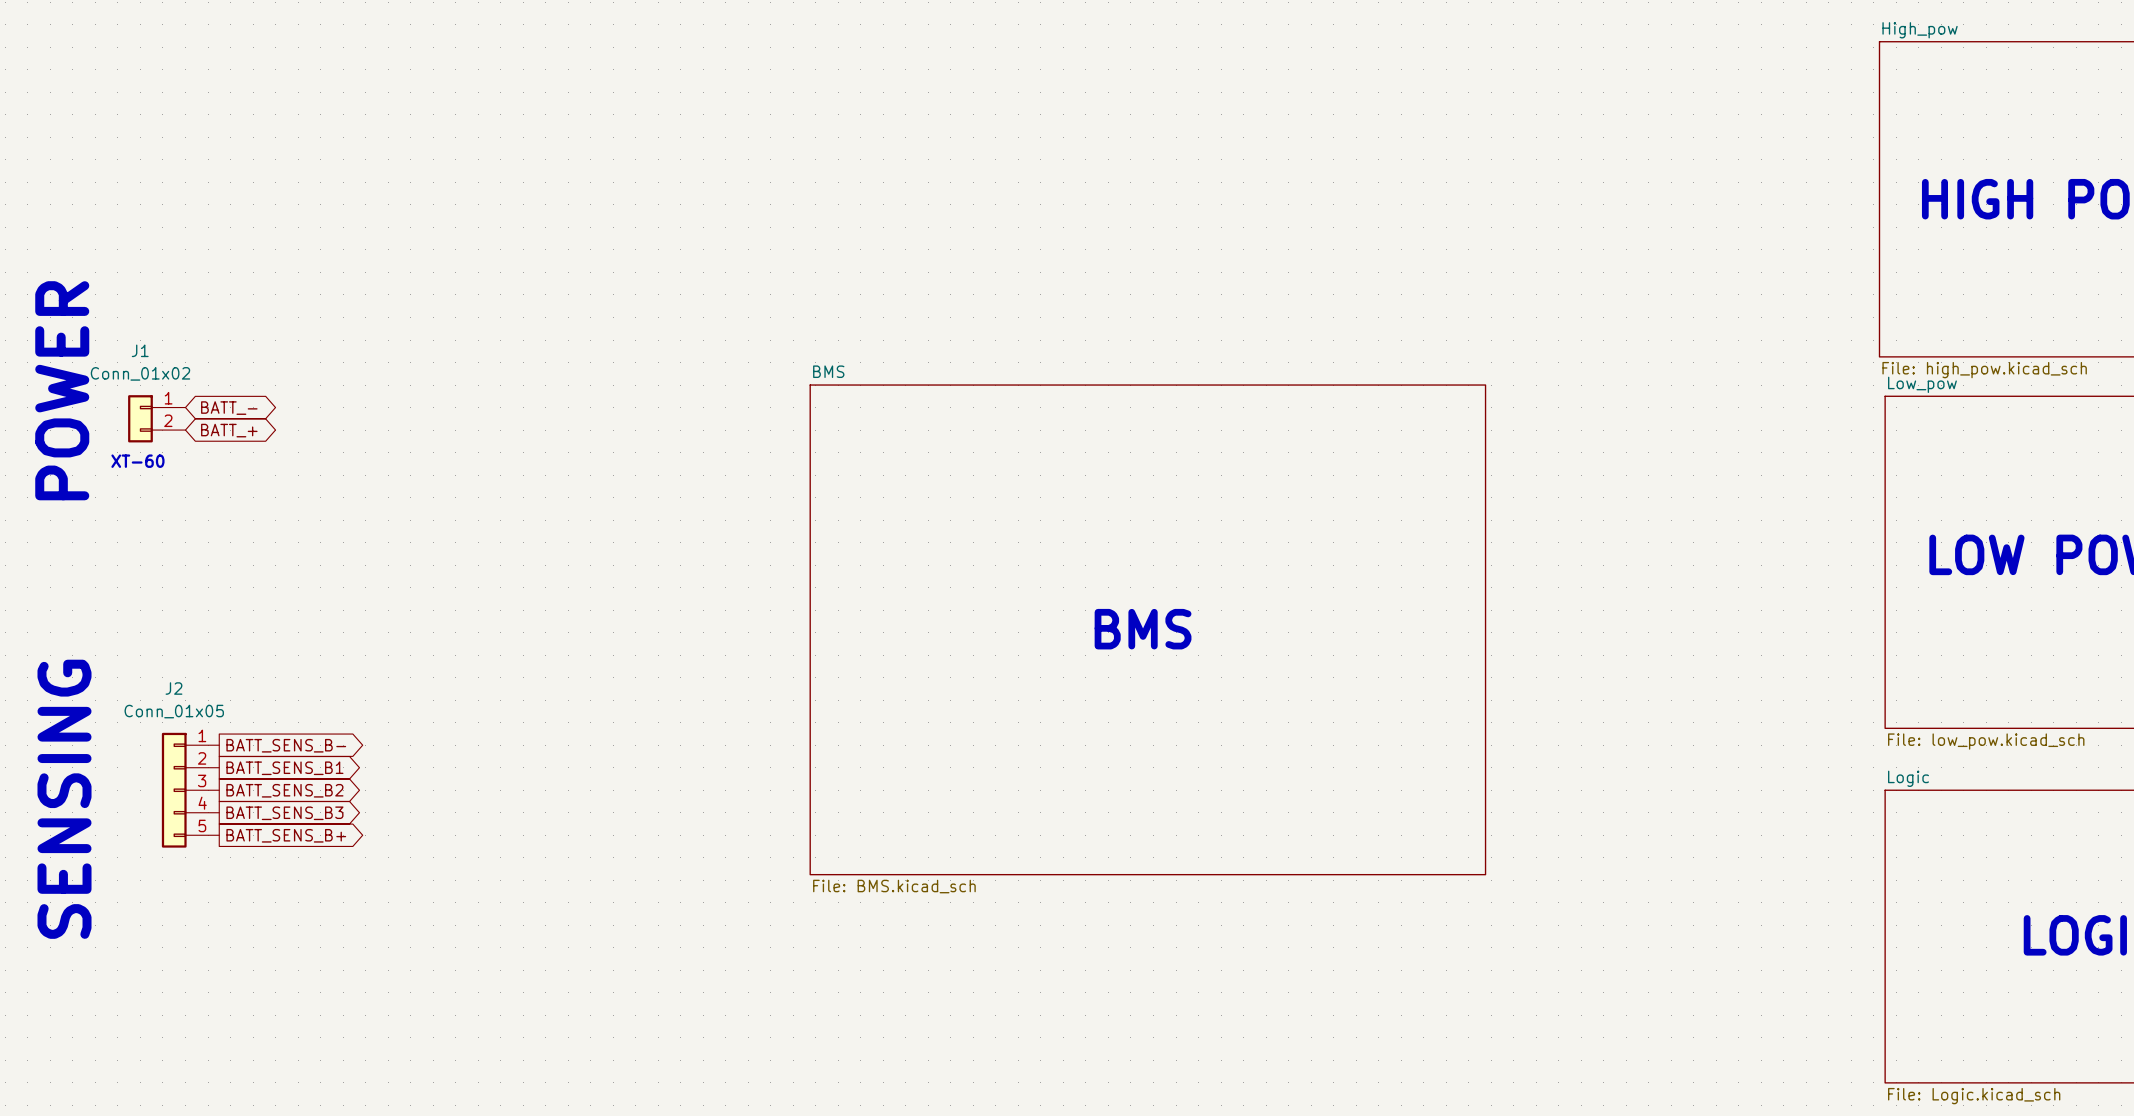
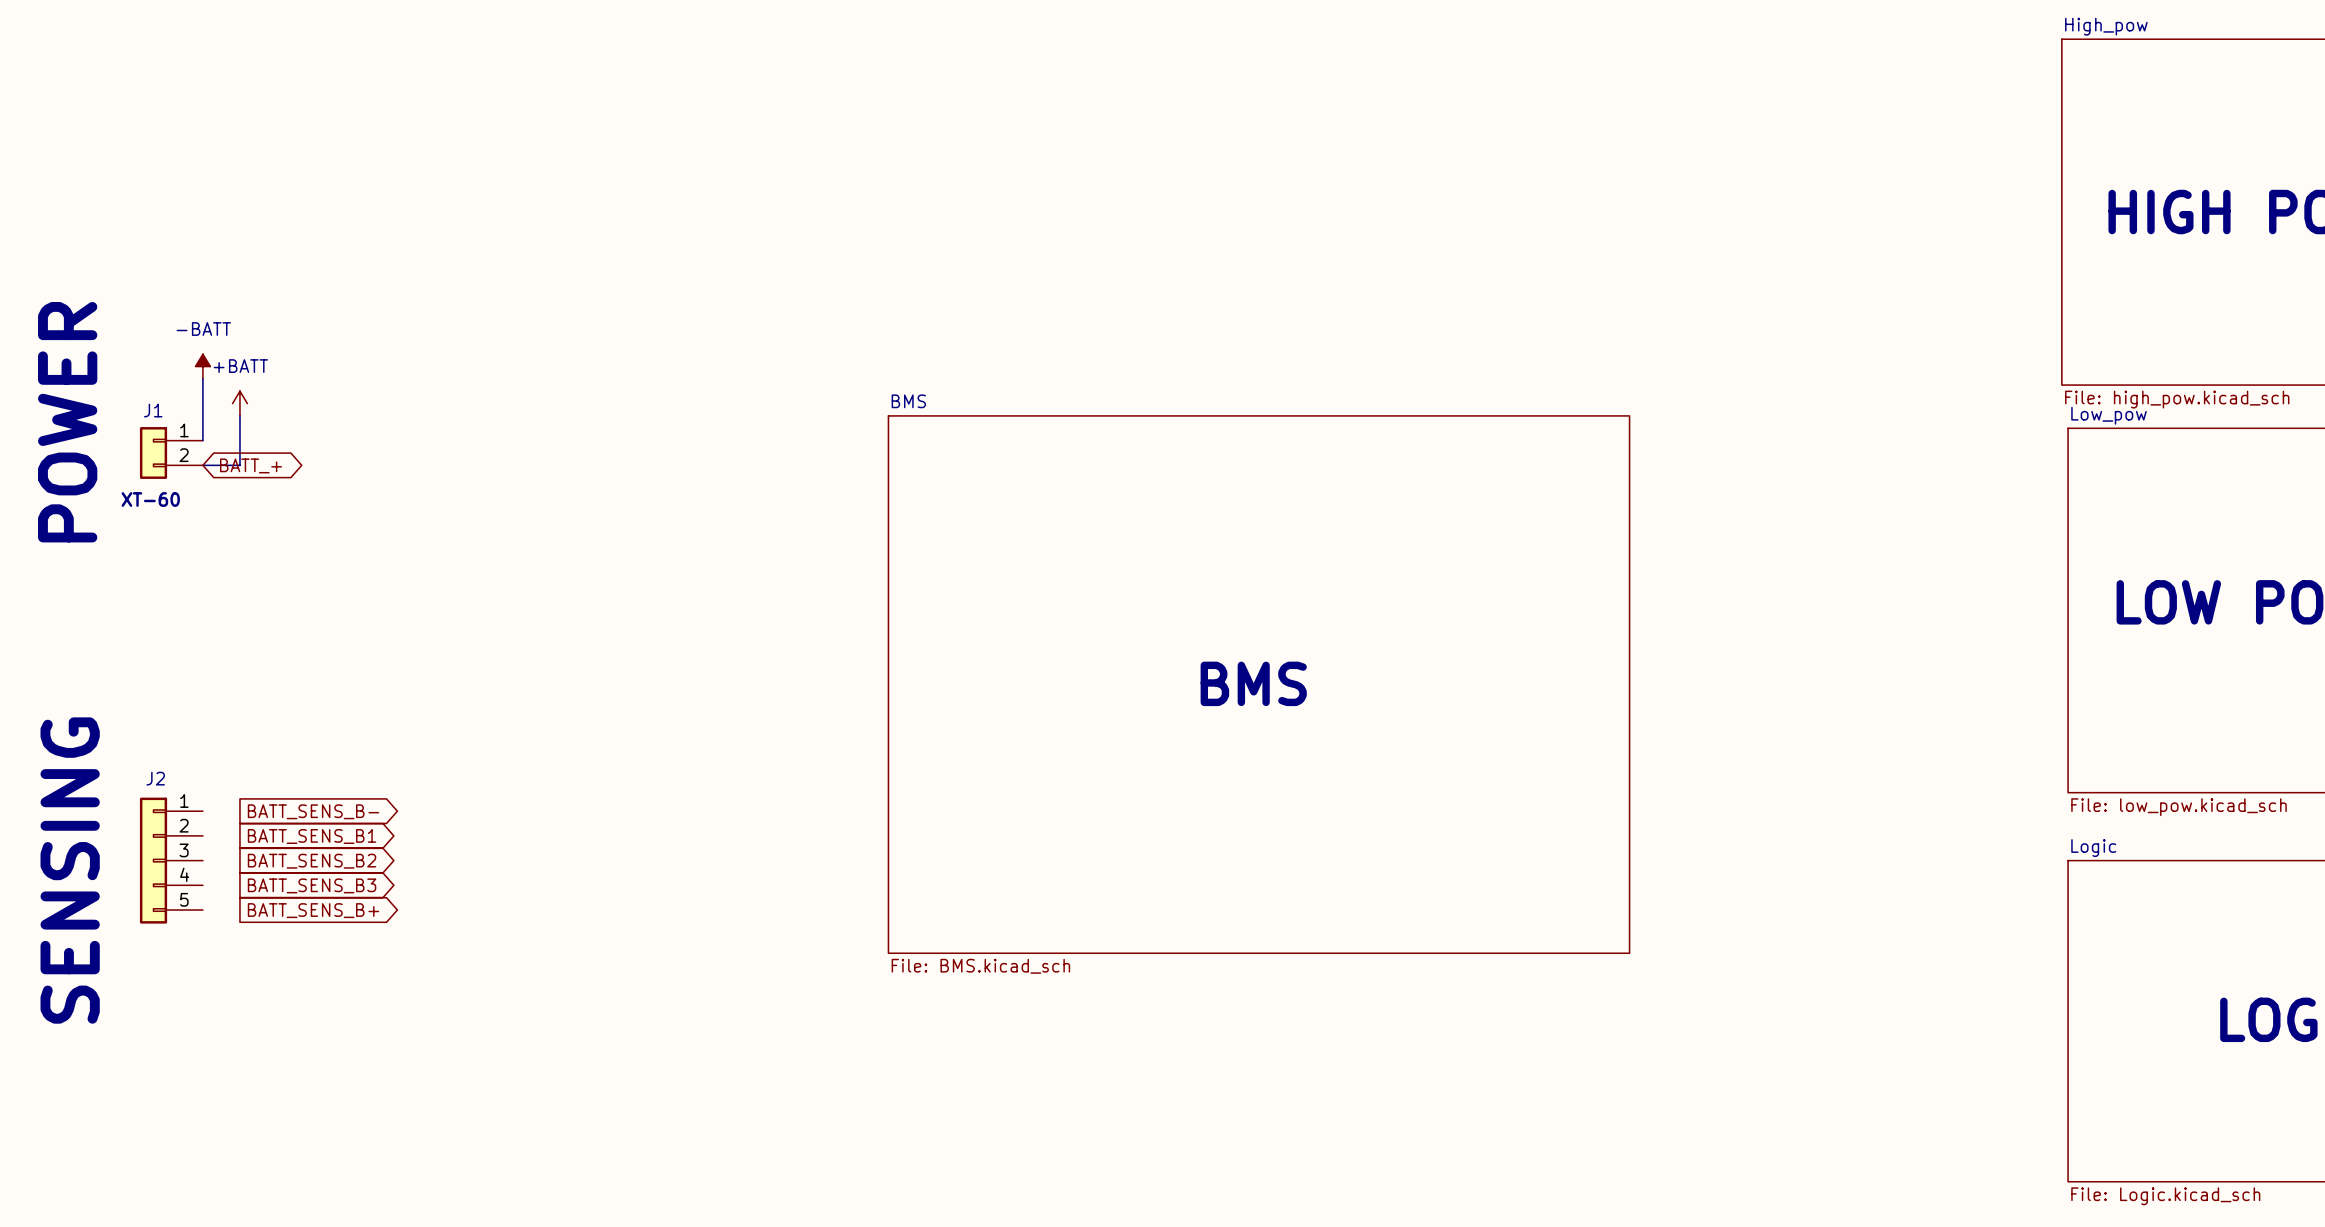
power symbol: none -> -BATT (202, 366)
J1 name position: J1 (140, 350) -> J1 (153, 410)
wire: none -> (202, 378) (202, 440)
J1 value: Conn_01x02 (140, 373) -> none
power symbol: none -> +BATT (239, 403)
wire: none -> (239, 415) (239, 465) (202, 465)
global label: BATT_- (229, 408) -> none
J2 name position: J2 (173, 688) -> J2 (155, 778)
J2 value: Conn_01x05 (174, 711) -> none
J2 position: (190, 790) -> (171, 860)

